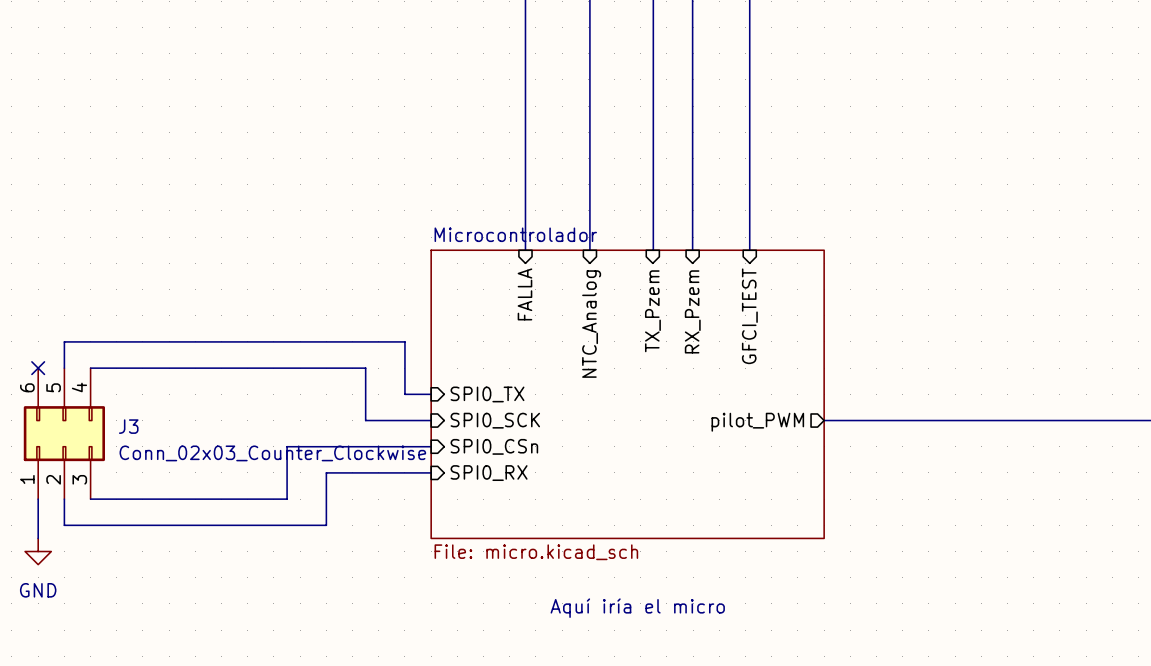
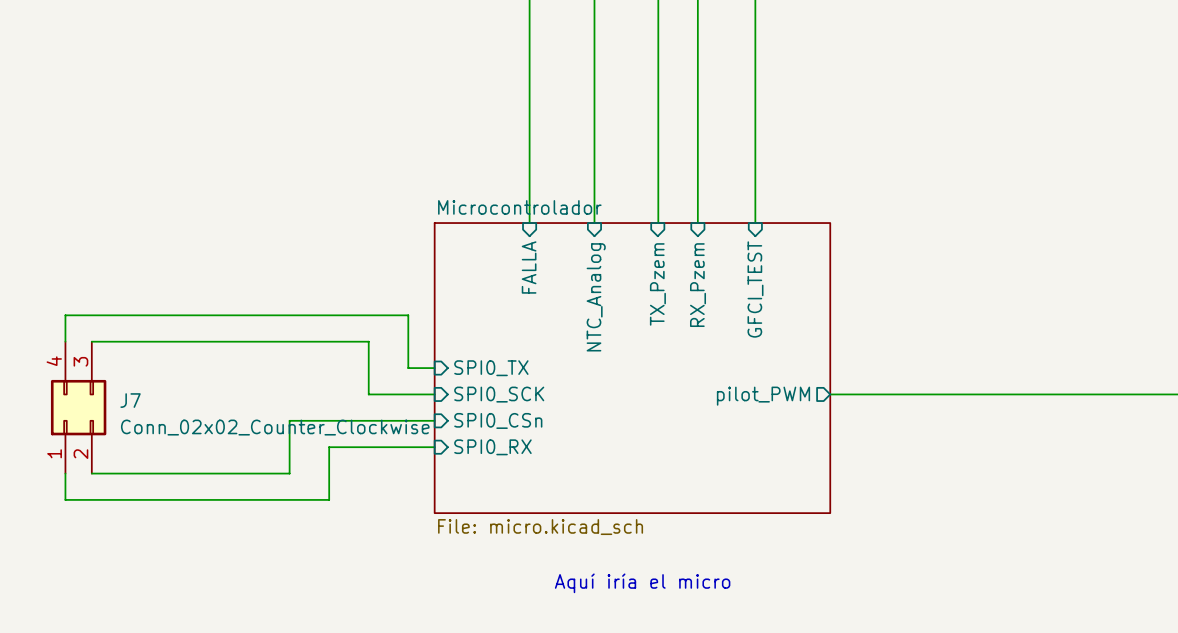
no-connect mark: (38, 368) -> none
J3: Conn_02x03_Counter_Clockwise (64, 433) -> none
J7: none -> Conn_02x02_Counter_Clockwise (78, 407)
wire: (38, 499) (38, 538) -> none
power symbol: GND (38, 551) -> none

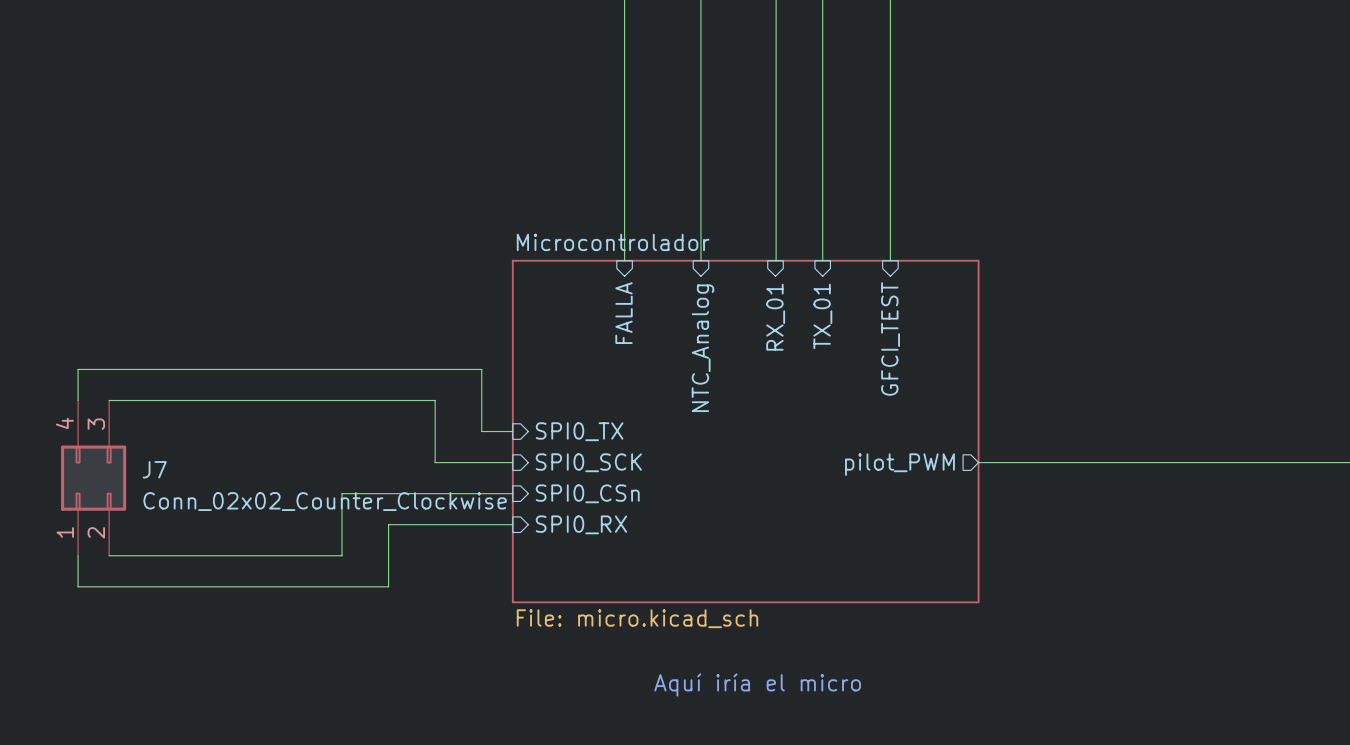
sheet pin: TX_Pzem (657, 284) -> RX_01 (775, 317)
sheet pin: RX_Pzem (698, 285) -> TX_01 (822, 316)

